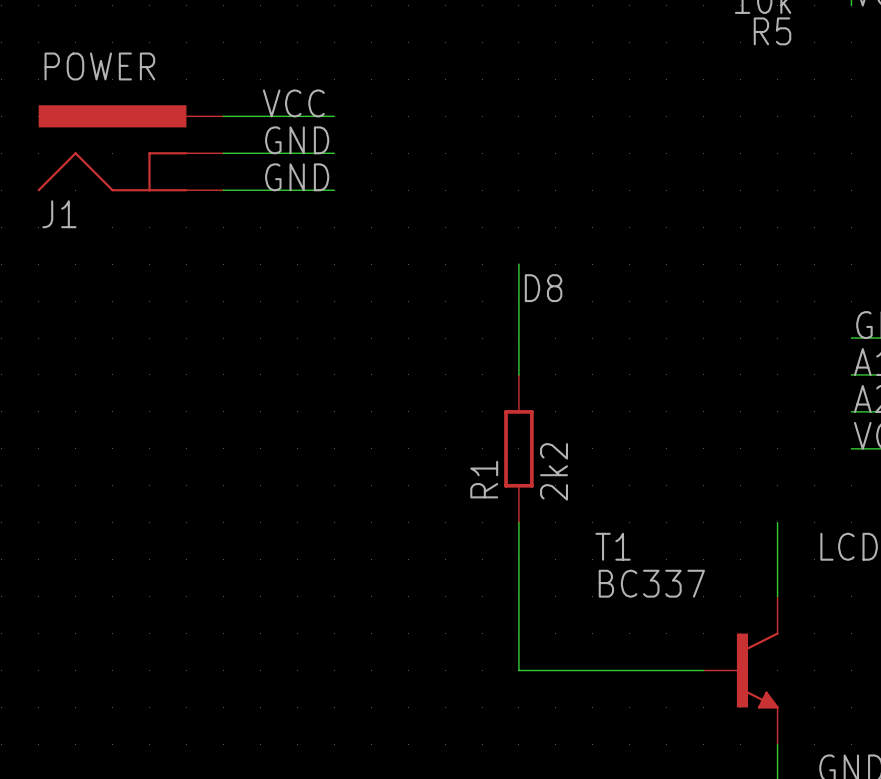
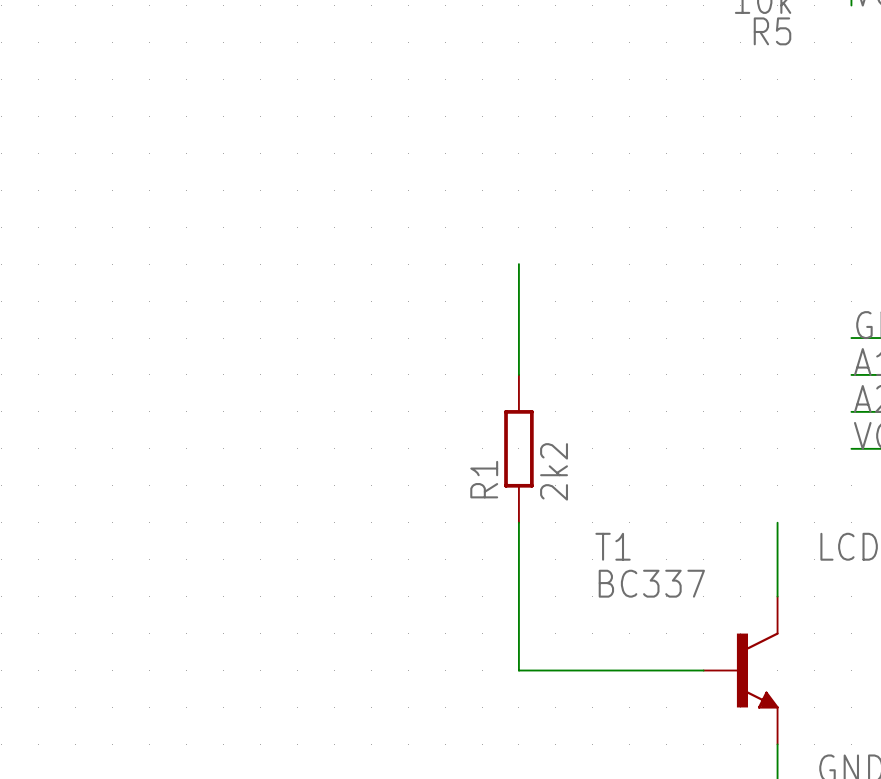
label: VCC (293, 103) -> none
wire: (223, 116) (334, 116) -> none
label: GND (297, 140) -> none
J1: POWER (130, 148) -> none
wire: (223, 153) (334, 153) -> none
label: GND (297, 177) -> none
wire: (223, 190) (334, 190) -> none
label: D8 (543, 288) -> none

